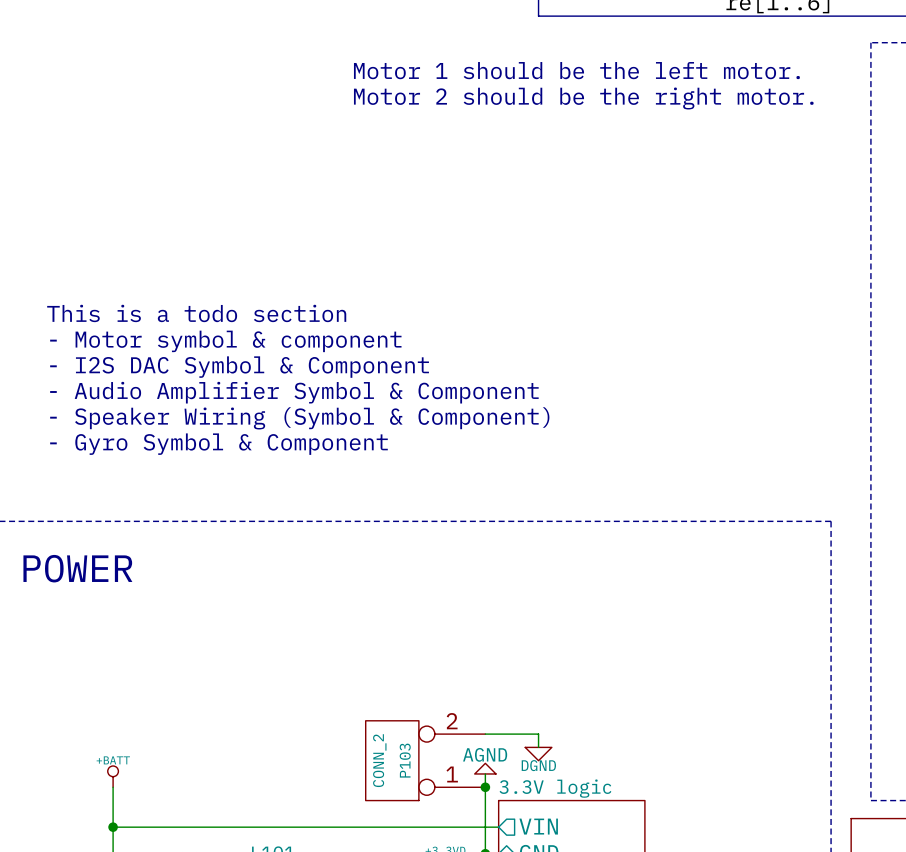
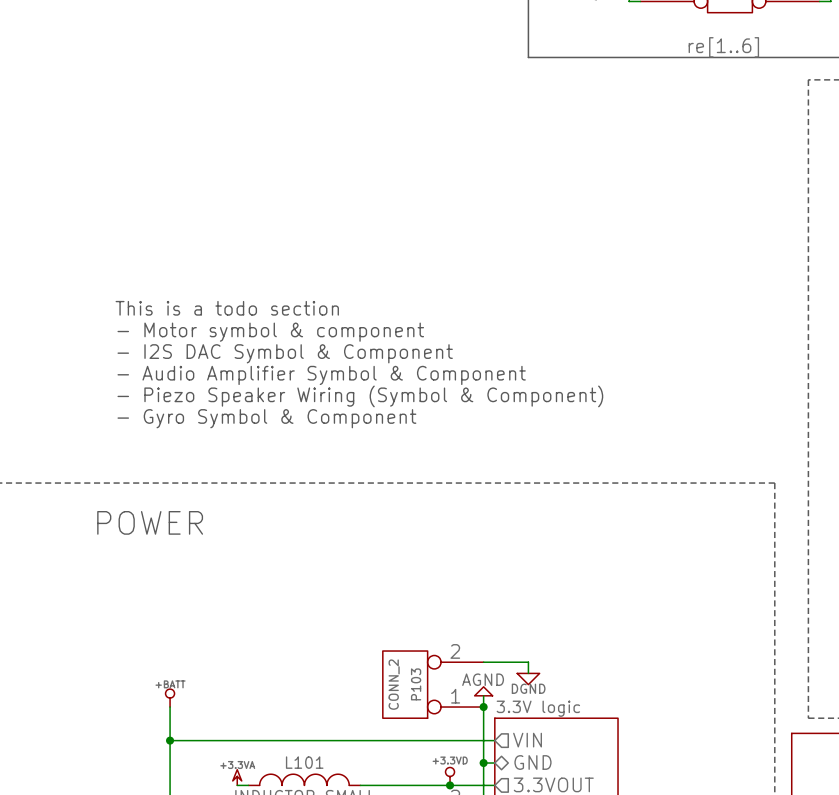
text: Motor 1 should be the left motor. (576, 70) -> none
text: Motor 2 should be the right motor. (583, 98) -> none
text: - Speaker Wiring (Symbol & Component) (299, 418) -> - Piezo Speaker Wiring (Symbol & Component) (360, 396)

